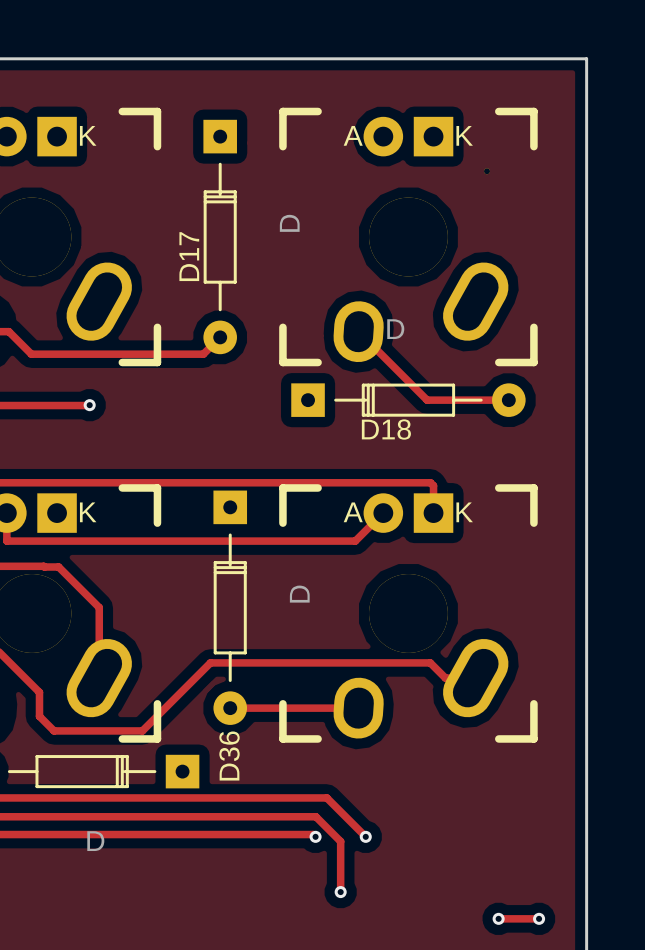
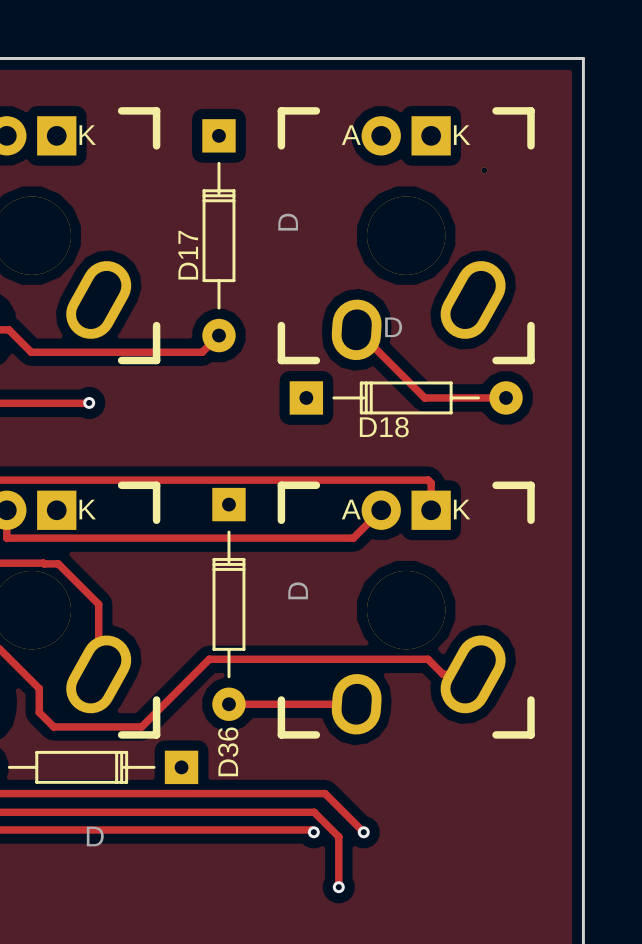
track: (498, 918) (539, 918) -> none
via: (498, 918) -> none
via: (539, 918) -> none

